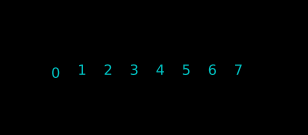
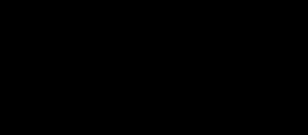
text: 1 (82, 69) -> none
text: 2 (107, 69) -> none
text: 3 (134, 69) -> none
text: 4 (160, 69) -> none
text: 5 (186, 69) -> none
text: 6 (212, 69) -> none
text: 7 (238, 69) -> none
text: 0 (55, 72) -> none

